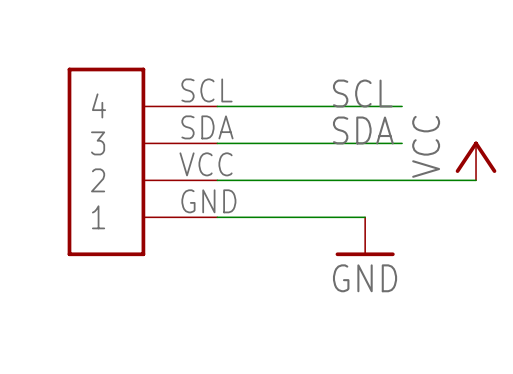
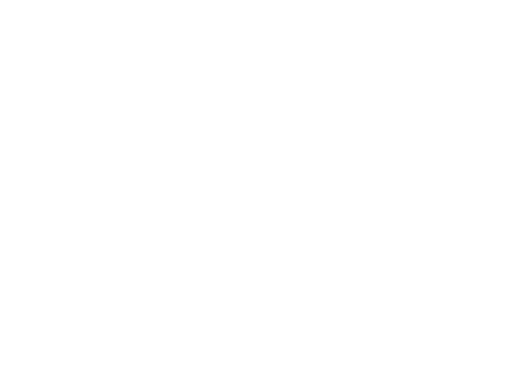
label: SCL (362, 93) -> none
wire: (217, 106) (402, 106) -> none
label: SDA (363, 130) -> none
wire: (217, 143) (402, 143) -> none
power symbol: VCC (476, 160) -> none
part: (142, 161) -> none
wire: (217, 180) (476, 180) -> none
wire: (217, 217) (365, 217) -> none
power symbol: GND (365, 236) -> none

